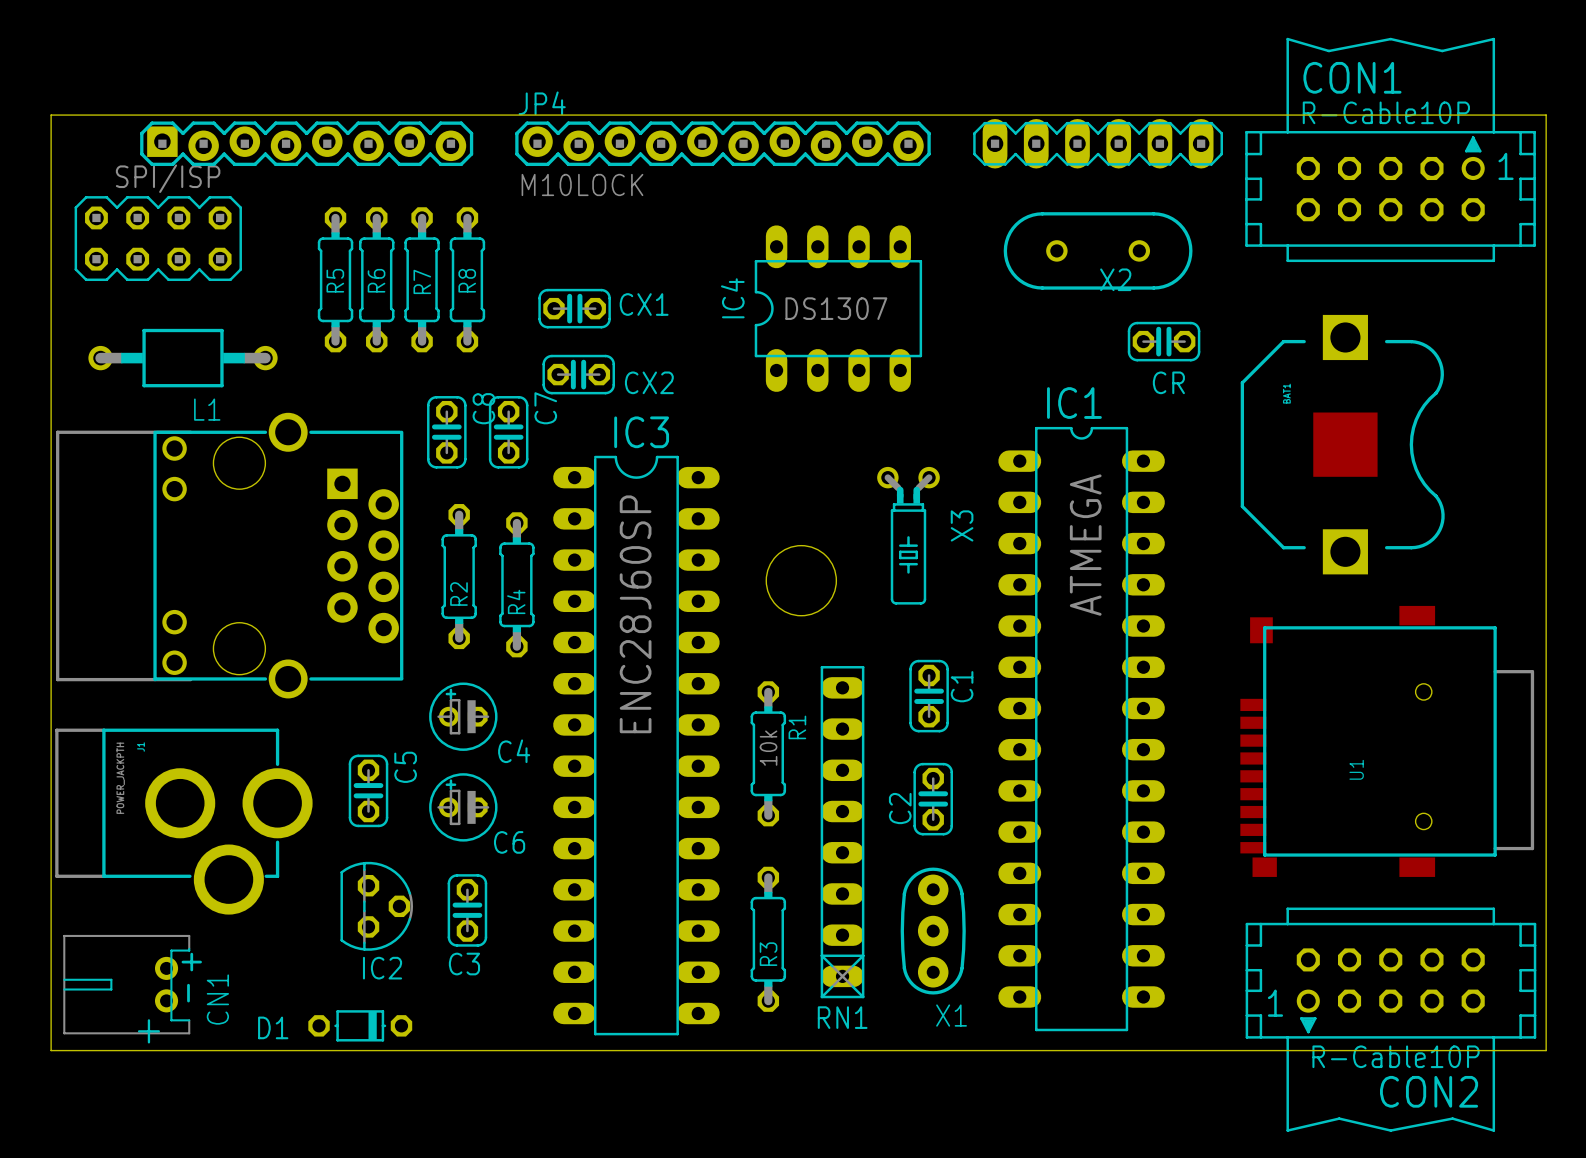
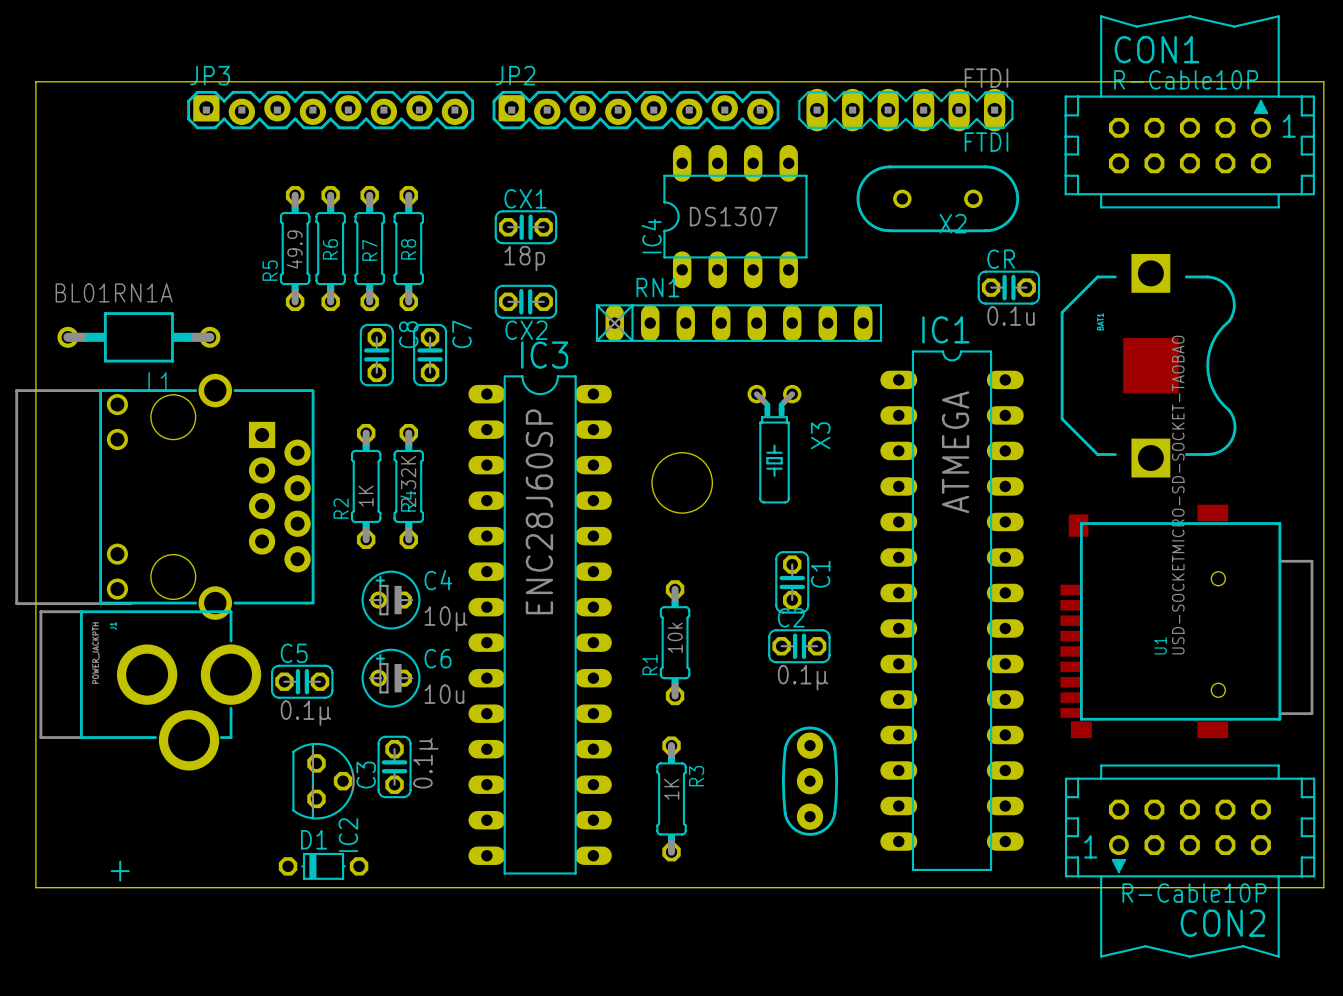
part: (306, 143) -> none
JP4: M10LOCK (722, 143) -> none
part: (1098, 143) -> none
JP3: none -> (330, 110)
JP2: none -> (636, 110)
FTDI: none -> FTDI (905, 110)
part: SPI/ISP (158, 238) -> none
R5 position: (335, 279) -> (295, 248)
R6 position: (376, 279) -> (330, 248)
R7 position: (422, 279) -> (369, 248)
R8 position: (467, 279) -> (408, 248)
R5 name position: R5 (335, 280) -> R5 (270, 270)
IC4 name position: IC4 (732, 298) -> IC4 (651, 236)
CX1 name position: CX1 (644, 304) -> CX1 (525, 198)
CX1 position: (574, 308) -> (525, 227)
IC4 position: (838, 308) -> (735, 216)
R5 value: none -> 49.9 (294, 249)
CX1 value: none -> 18p (524, 258)
CR: (1164, 341) -> none
CR: none -> 0.1u (1008, 287)
L1 position: (183, 358) -> (138, 337)
L1 value: none -> BL01RN1A (114, 292)
CX2 position: (578, 374) -> (525, 301)
CX2 name position: CX2 (649, 382) -> CX2 (526, 330)
part position: (229, 555) -> (164, 496)
R2 position: (459, 576) -> (366, 486)
R4 value: none -> 2.32K (408, 481)
R4 position: (516, 584) -> (408, 486)
R2 name position: R2 (458, 594) -> R2 (341, 508)
U1 value: none -> USD-SOCKETMICRO-SD-SOCKET-TAOBAO (1178, 495)
R2 value: none -> 1K (365, 496)
R1 name position: R1 (797, 727) -> R1 (650, 664)
IC1 position: (1081, 729) -> (952, 610)
C4 value: none -> 10µ (445, 619)
C4 name position: C4 (514, 751) -> C4 (438, 580)
R1 position: (768, 753) -> (675, 642)
C5 name position: C5 (405, 767) -> C5 (294, 653)
C5 rotation: 0° (368, 790) -> 90° clockwise (302, 681)
C2 rotation: 0° (933, 799) -> 90° clockwise (799, 646)
C2 value: none -> 0.1µ (803, 677)
C6 value: none -> 10u (444, 694)
RN1 rotation: 0° (842, 832) -> 90° clockwise (738, 323)
RN1 position: (842, 832) -> (738, 323)
C6 name position: C6 (509, 842) -> C6 (437, 658)
C5 value: none -> 0.1µ (305, 713)
IC2 position: (376, 906) -> (323, 781)
C3 value: none -> 0.1µ (425, 763)
part position: (933, 931) -> (810, 781)
R3 value: none -> 1K (671, 789)
R3 position: (768, 939) -> (671, 798)
R3 name position: R3 (768, 954) -> R3 (696, 776)
C3 name rotation: 0° (464, 964) -> 90° counterclockwise (366, 775)
C3 name position: C3 (464, 964) -> C3 (366, 775)
IC2 name rotation: 0° (382, 968) -> 90° counterclockwise (348, 835)
CN1: (126, 984) -> none
text: X1 (951, 1015) -> none
RN1 name position: RN1 (842, 1017) -> RN1 (657, 287)
D1 rotation: 0° (360, 1025) -> 180° (323, 866)
D1 name position: D1 (273, 1027) -> D1 (314, 839)

